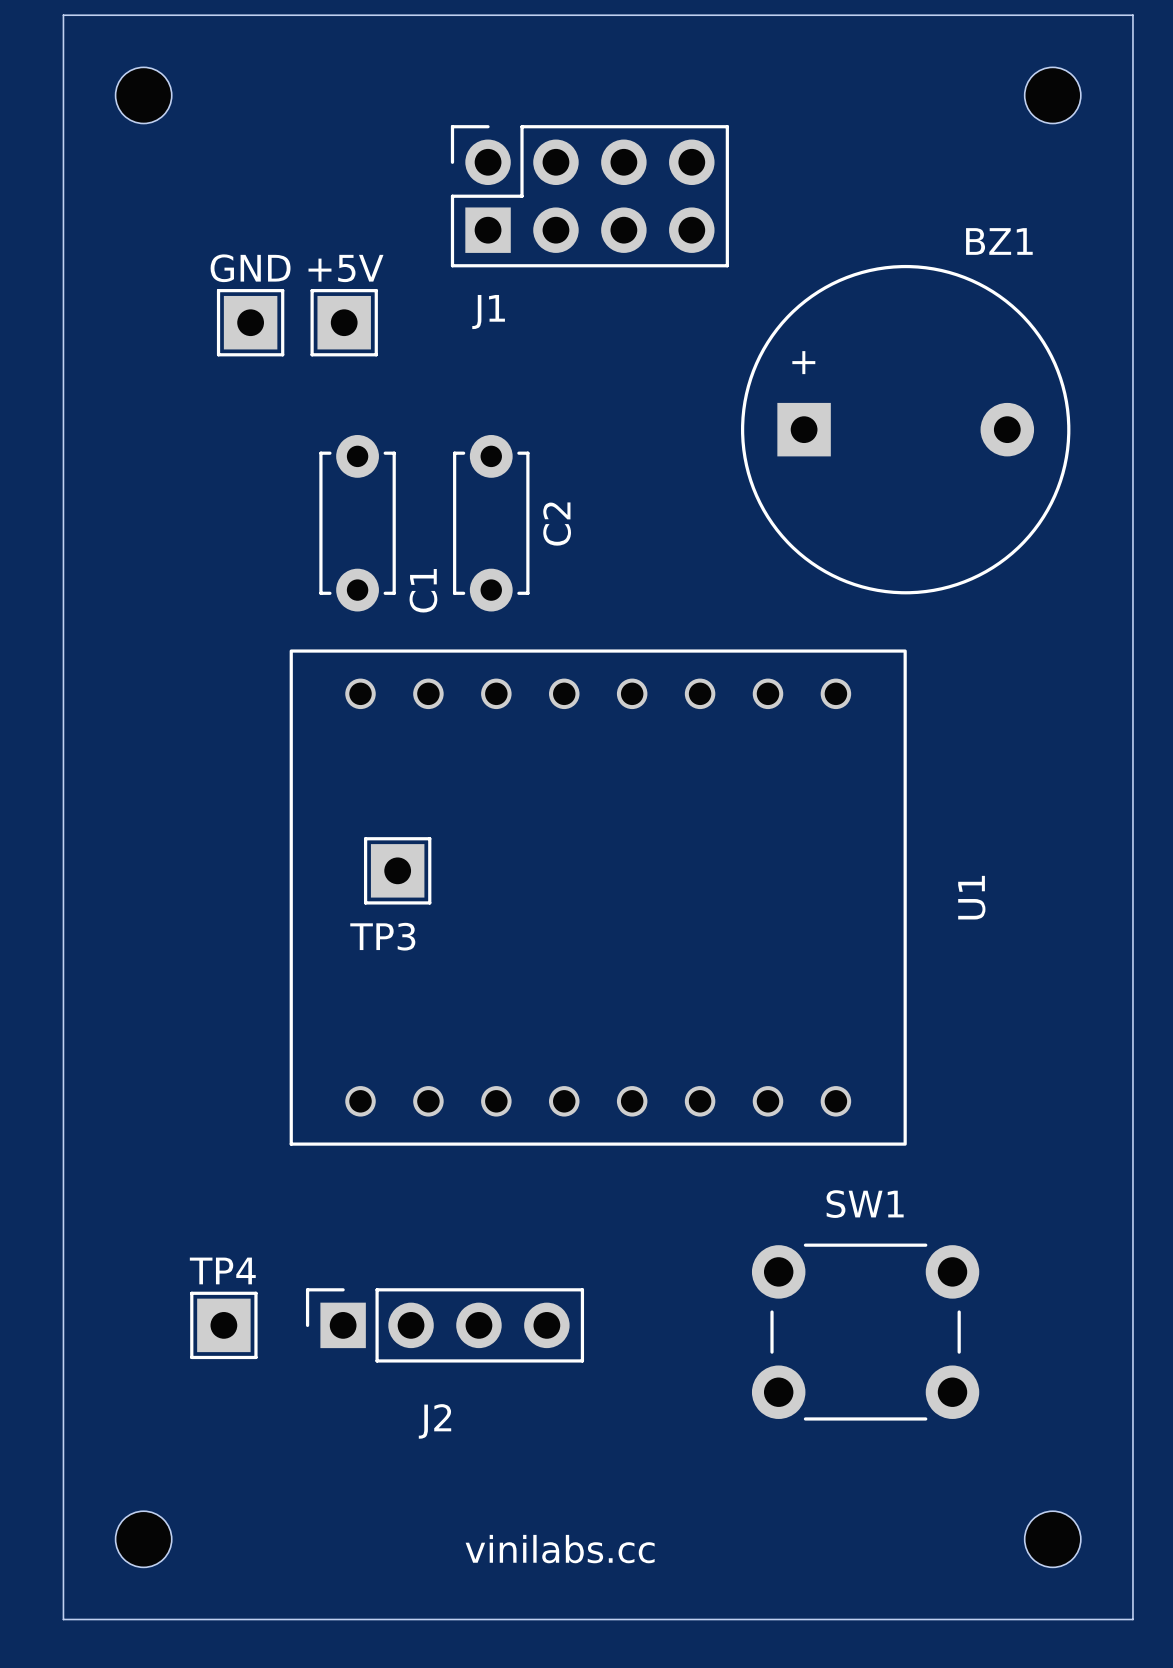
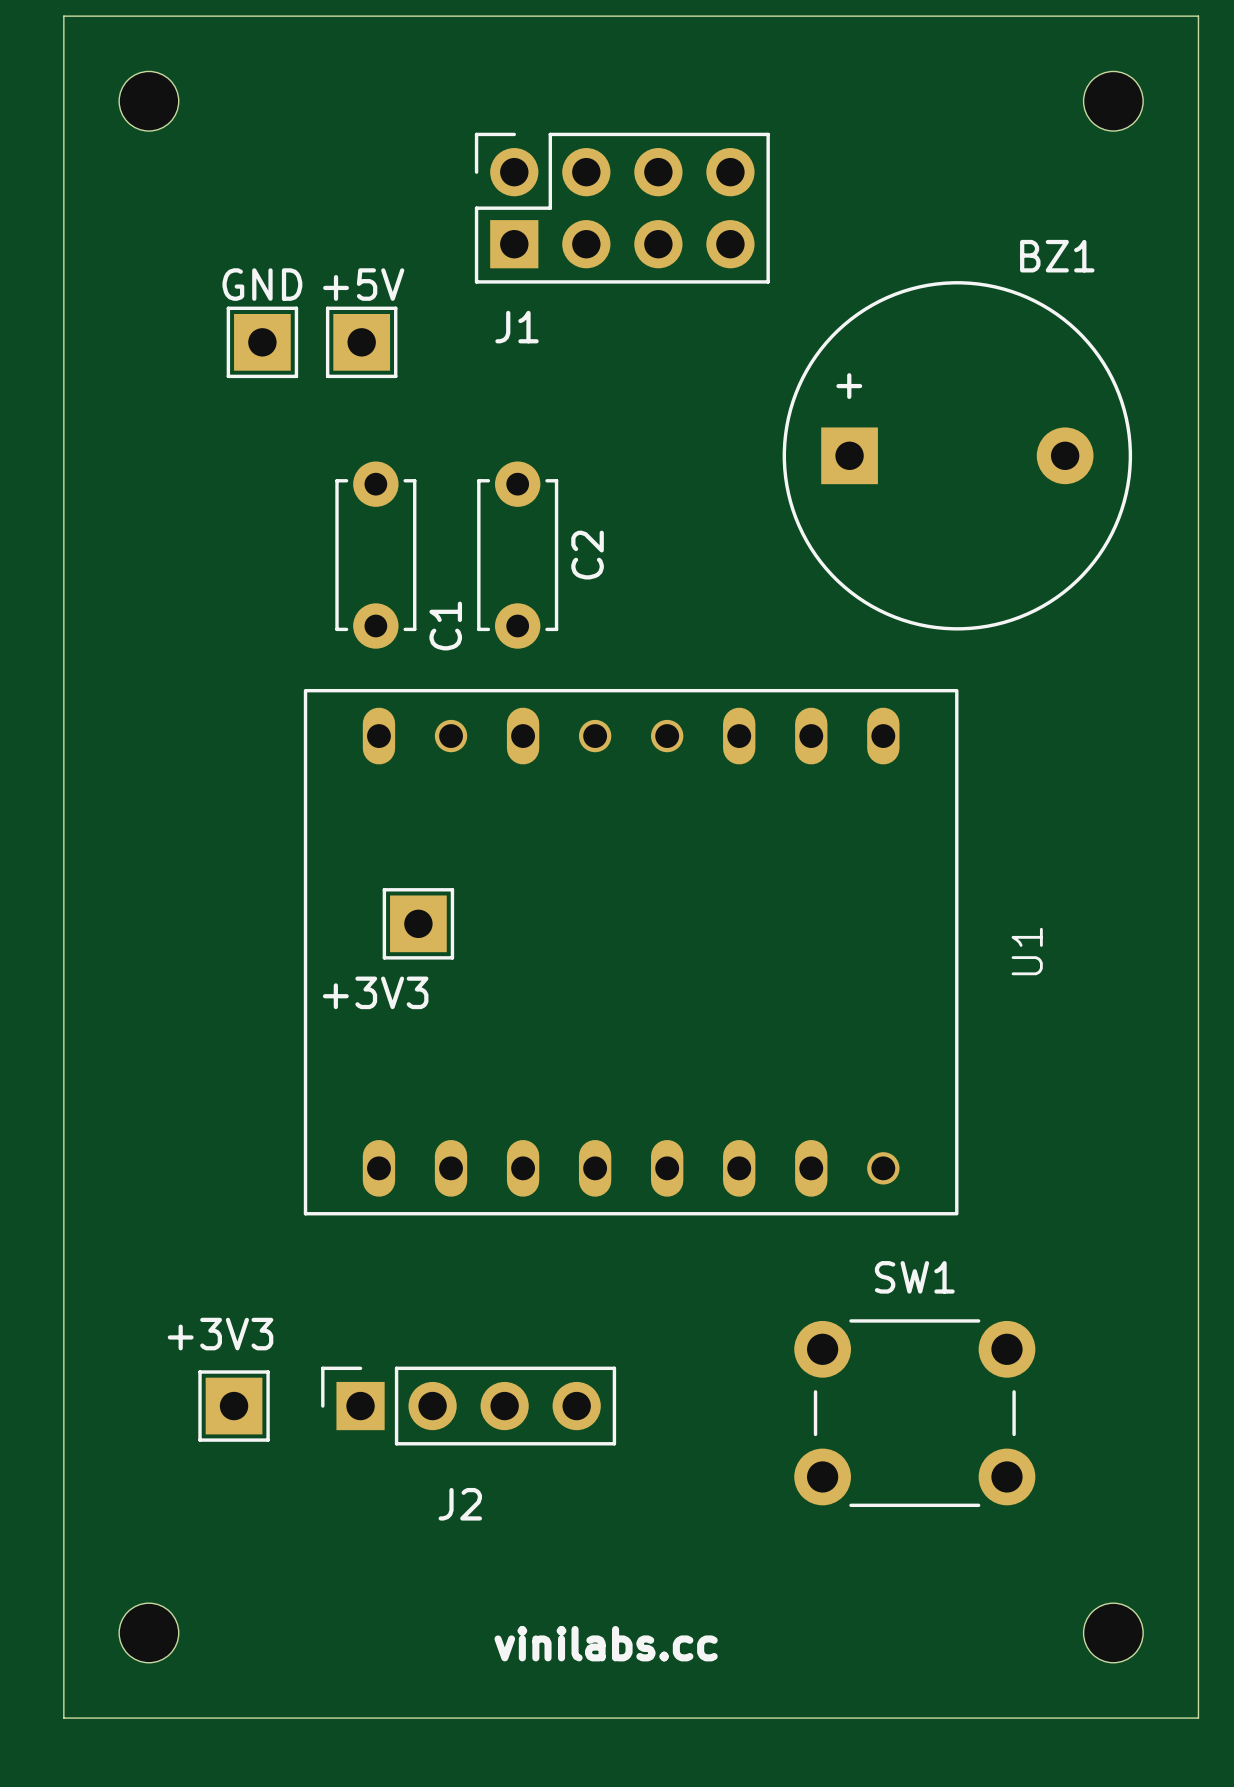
U1 footprint: [289, 649, 907, 1146] -> [303, 688, 959, 1216]
TP3 value: none -> +3V3 (375, 992)
TP3 name: TP3 (382, 936) -> none
TP4 value: none -> +3V3 (220, 1334)
TP4 name: TP4 (222, 1270) -> none

